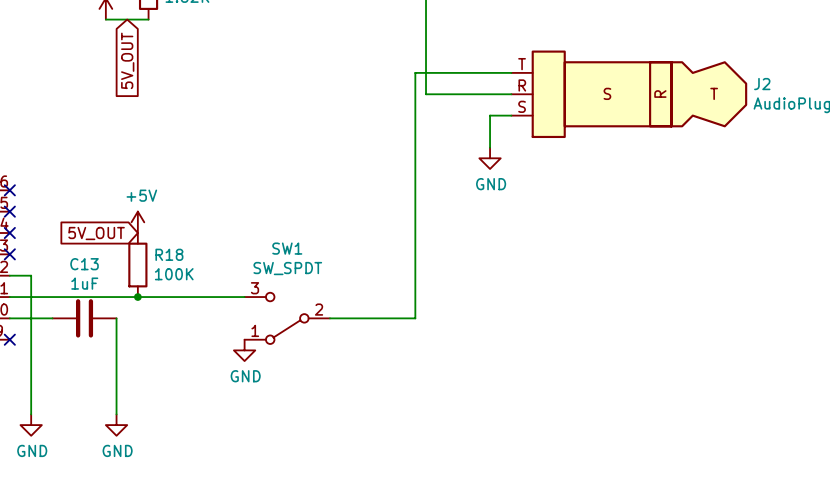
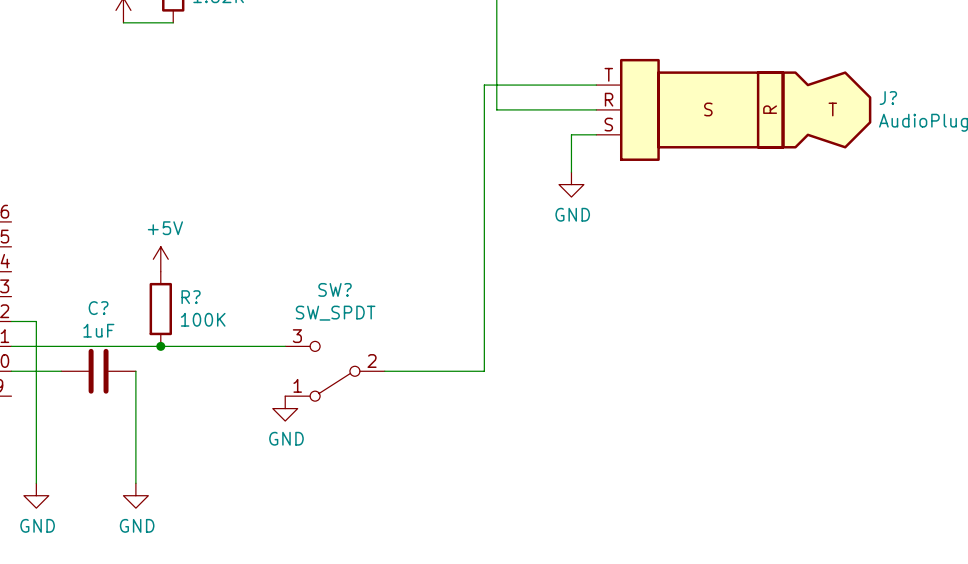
global label: 5V_OUT (127, 60) -> none
J2 name: J2 (762, 84) -> J? (888, 98)
no-connect mark: (9, 190) -> none
no-connect mark: (9, 211) -> none
no-connect mark: (9, 233) -> none
global label: 5V_OUT (96, 233) -> none
SW1 name: SW1 (287, 248) -> SW? (335, 289)
no-connect mark: (9, 254) -> none
R18 name: R18 (169, 254) -> R? (191, 297)
C13 name: C13 (84, 264) -> C? (98, 308)
no-connect mark: (9, 339) -> none

